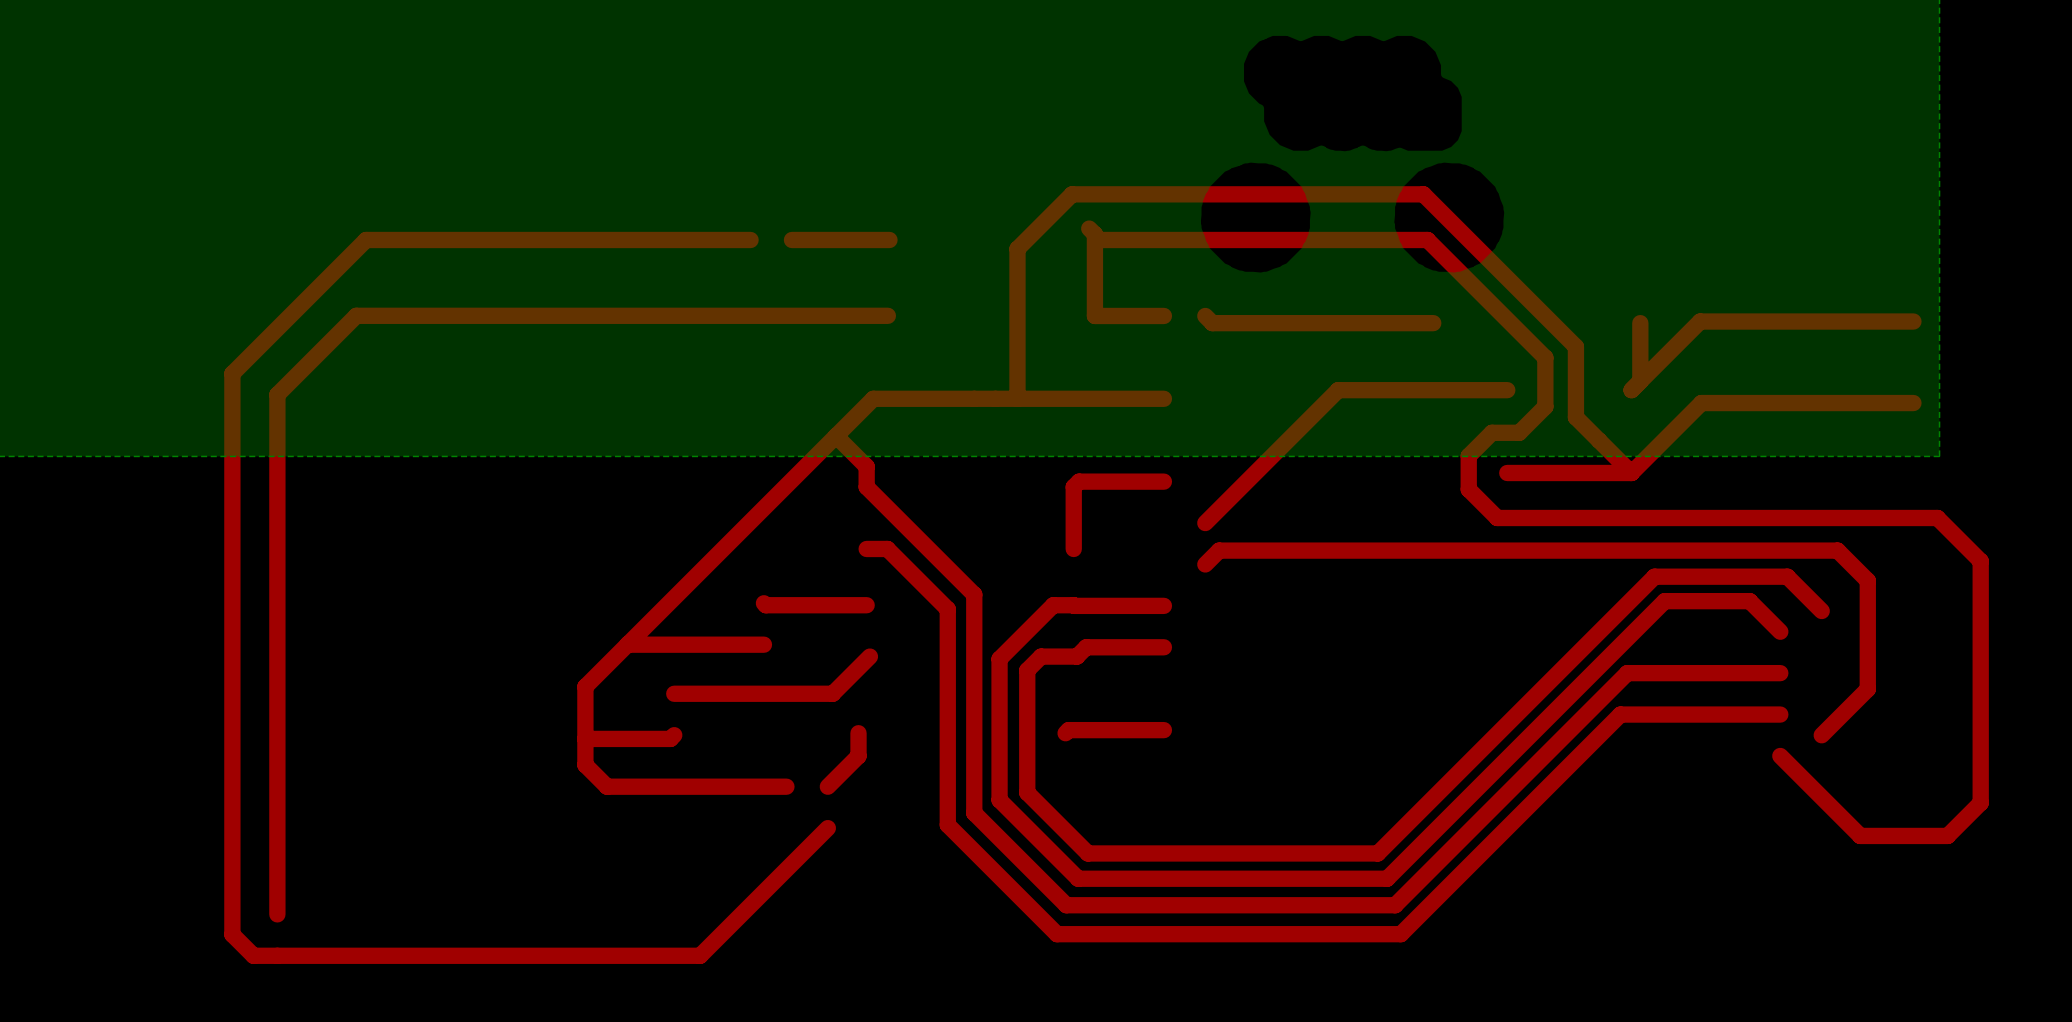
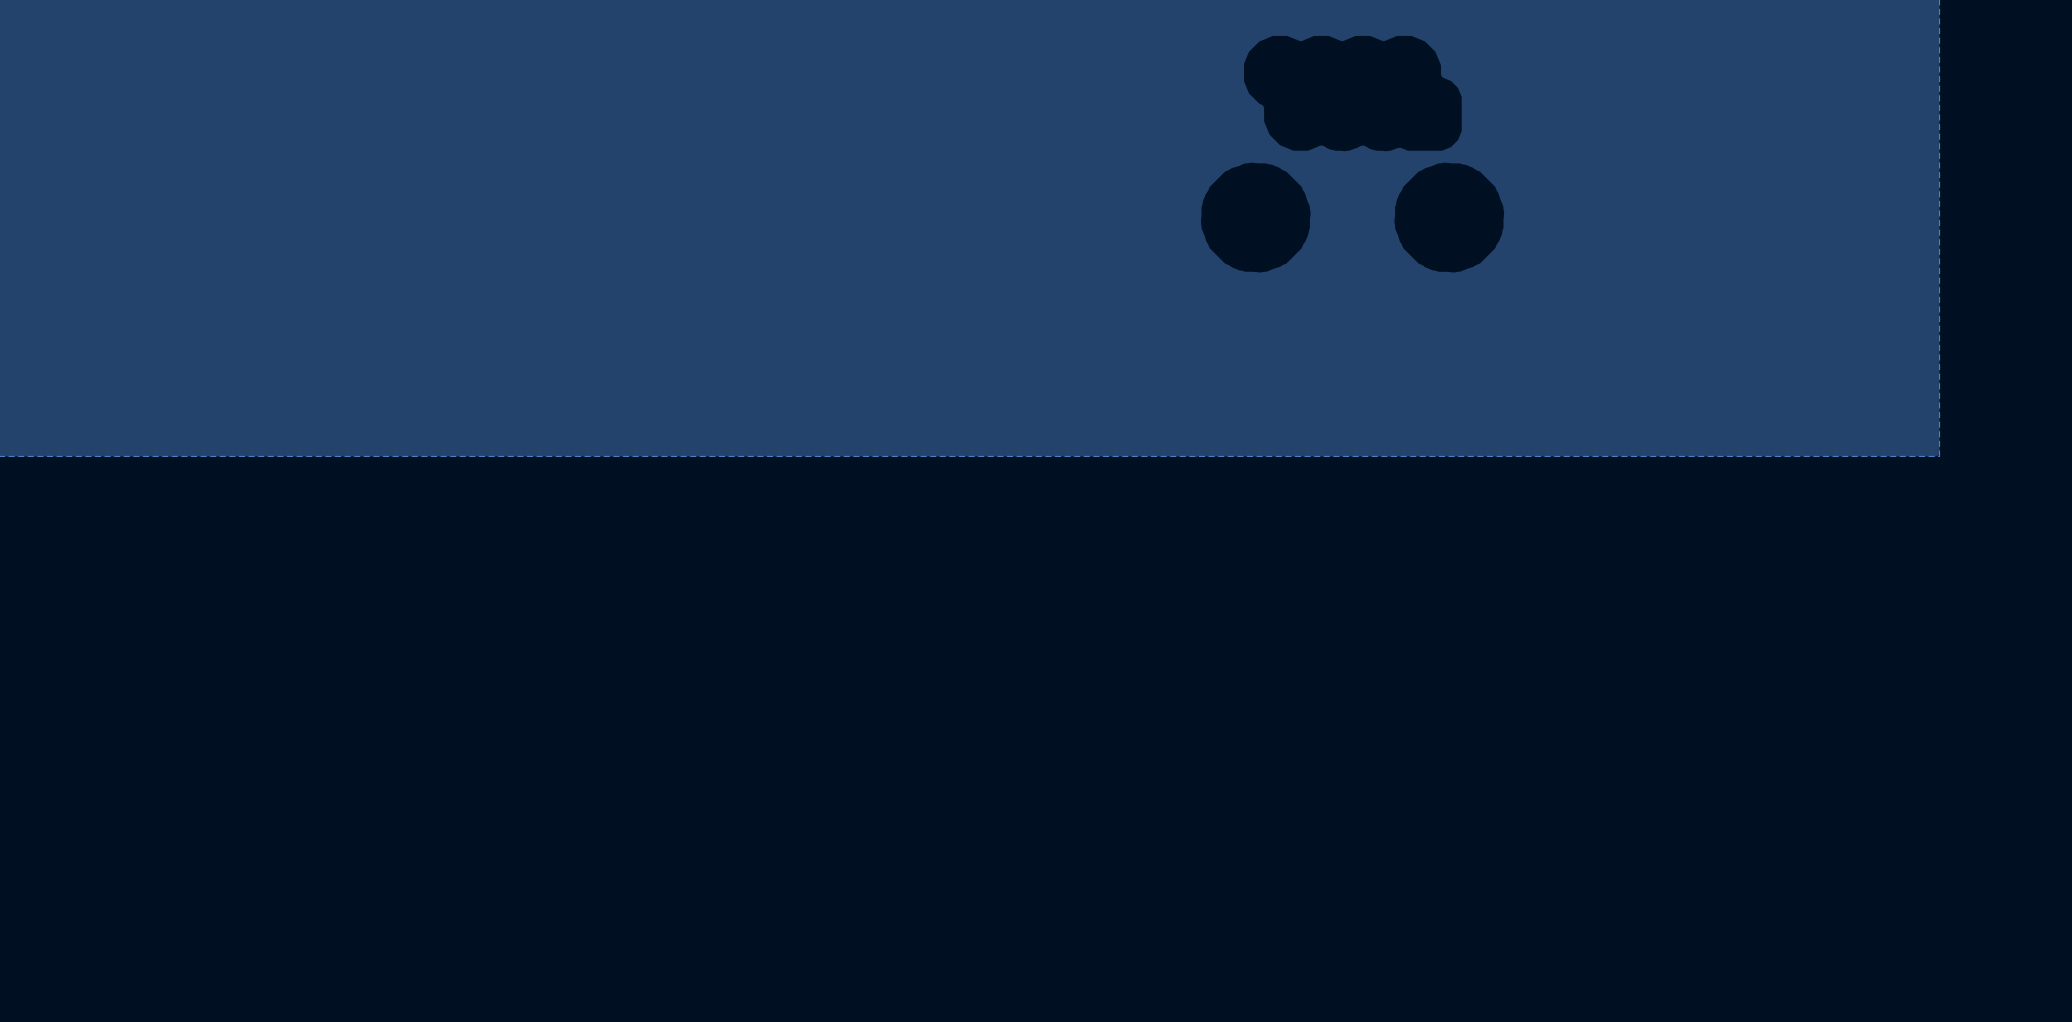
top track: (1089, 228) (1094, 234) (1094, 315) -> none
top track: (750, 239) (366, 239) (232, 373) (232, 934) (253, 955) (700, 955) (827, 828) -> none
top track: (889, 239) (791, 239) -> none
top track: (1096, 239) (1427, 239) (1545, 357) (1545, 406) (1519, 432) (1491, 432) (1468, 456) (1468, 489) (1497, 518) (1937, 518) (1980, 561) (1980, 802) (1947, 835) (1860, 835) (1780, 755) -> none
top track: (887, 315) (356, 315) (277, 394) (277, 914) -> none
top track: (1163, 315) (1095, 315) -> none
top track: (1205, 315) (1212, 323) (1433, 323) -> none
top track: (1913, 321) (1700, 321) (1631, 390) -> none
top track: (1640, 323) (1640, 381) -> none
top track: (1507, 390) (1338, 390) (1205, 523) -> none
top track: (1017, 398) (1017, 248) (1072, 194) (1423, 194) (1575, 346) (1575, 417) (1631, 472) -> none
top track: (1163, 398) (873, 398) (585, 686) (585, 765) (607, 786) (786, 786) -> none
top track: (1913, 403) (1701, 403) (1631, 472) -> none
top track: (836, 436) (866, 466) (866, 487) (974, 594) (974, 813) (1066, 905) (1395, 905) (1627, 673) (1780, 673) -> none
top track: (1631, 472) (1507, 472) -> none
top track: (1163, 481) (1079, 481) (1073, 487) (1073, 548) -> none
top track: (866, 548) (887, 548) (947, 609) (947, 824) (1057, 934) (1400, 934) (1620, 714) (1780, 714) -> none
top track: (1205, 564) (1219, 550) (1837, 550) (1867, 580) (1867, 689) (1821, 735) -> none
top track: (763, 603) (765, 605) (866, 605) -> none
top track: (1163, 605) (1053, 605) (999, 659) (999, 800) (1078, 878) (1387, 878) (1664, 601) (1749, 601) (1780, 631) -> none
top track: (1821, 611) (1787, 576) (1654, 576) (1377, 853) (1088, 853) (1027, 792) (1027, 670) (1041, 656) (1076, 656) (1086, 647) (1163, 647) -> none
top track: (763, 644) (627, 644) -> none
top track: (869, 656) (832, 693) (674, 693) -> none
top track: (1163, 730) (1068, 730) (1065, 733) -> none
top track: (858, 733) (858, 756) (827, 786) -> none
top track: (674, 735) (670, 738) (585, 738) -> none

